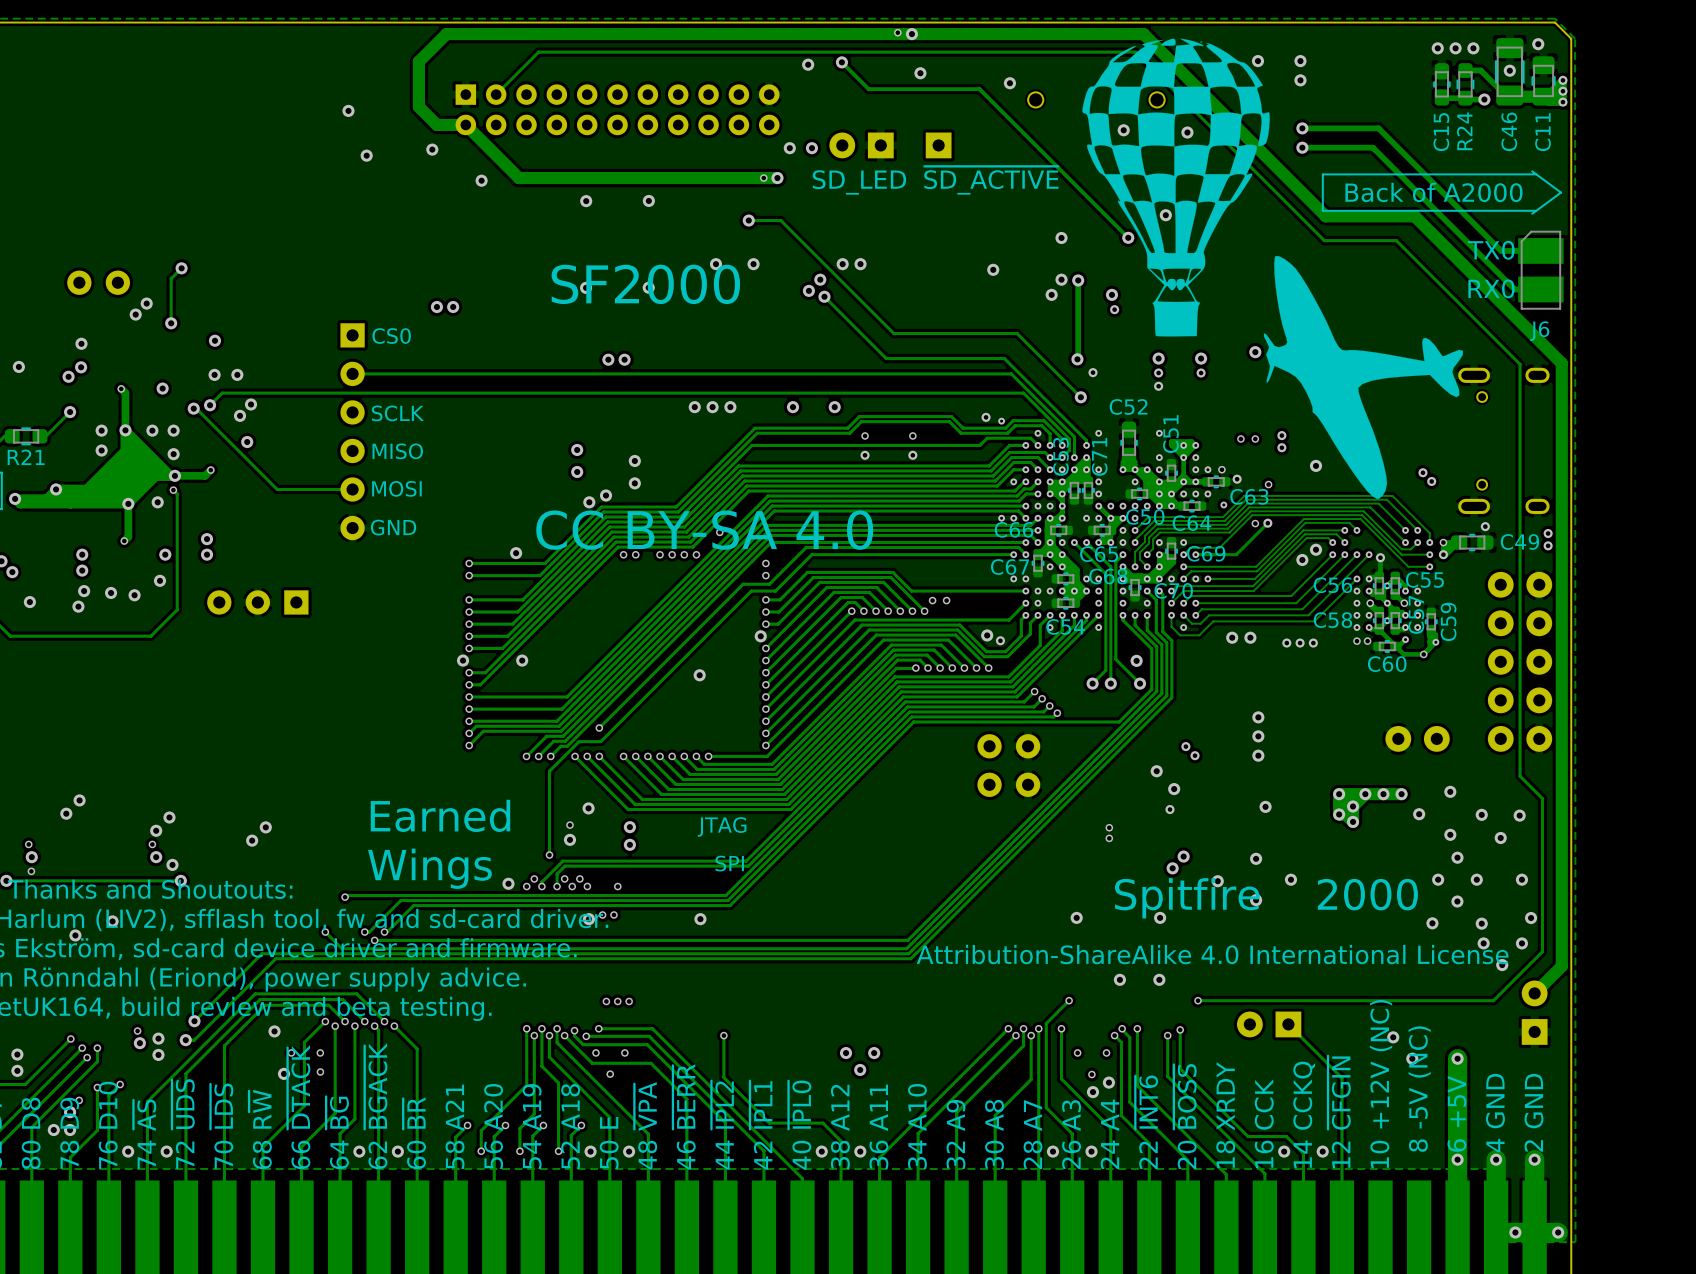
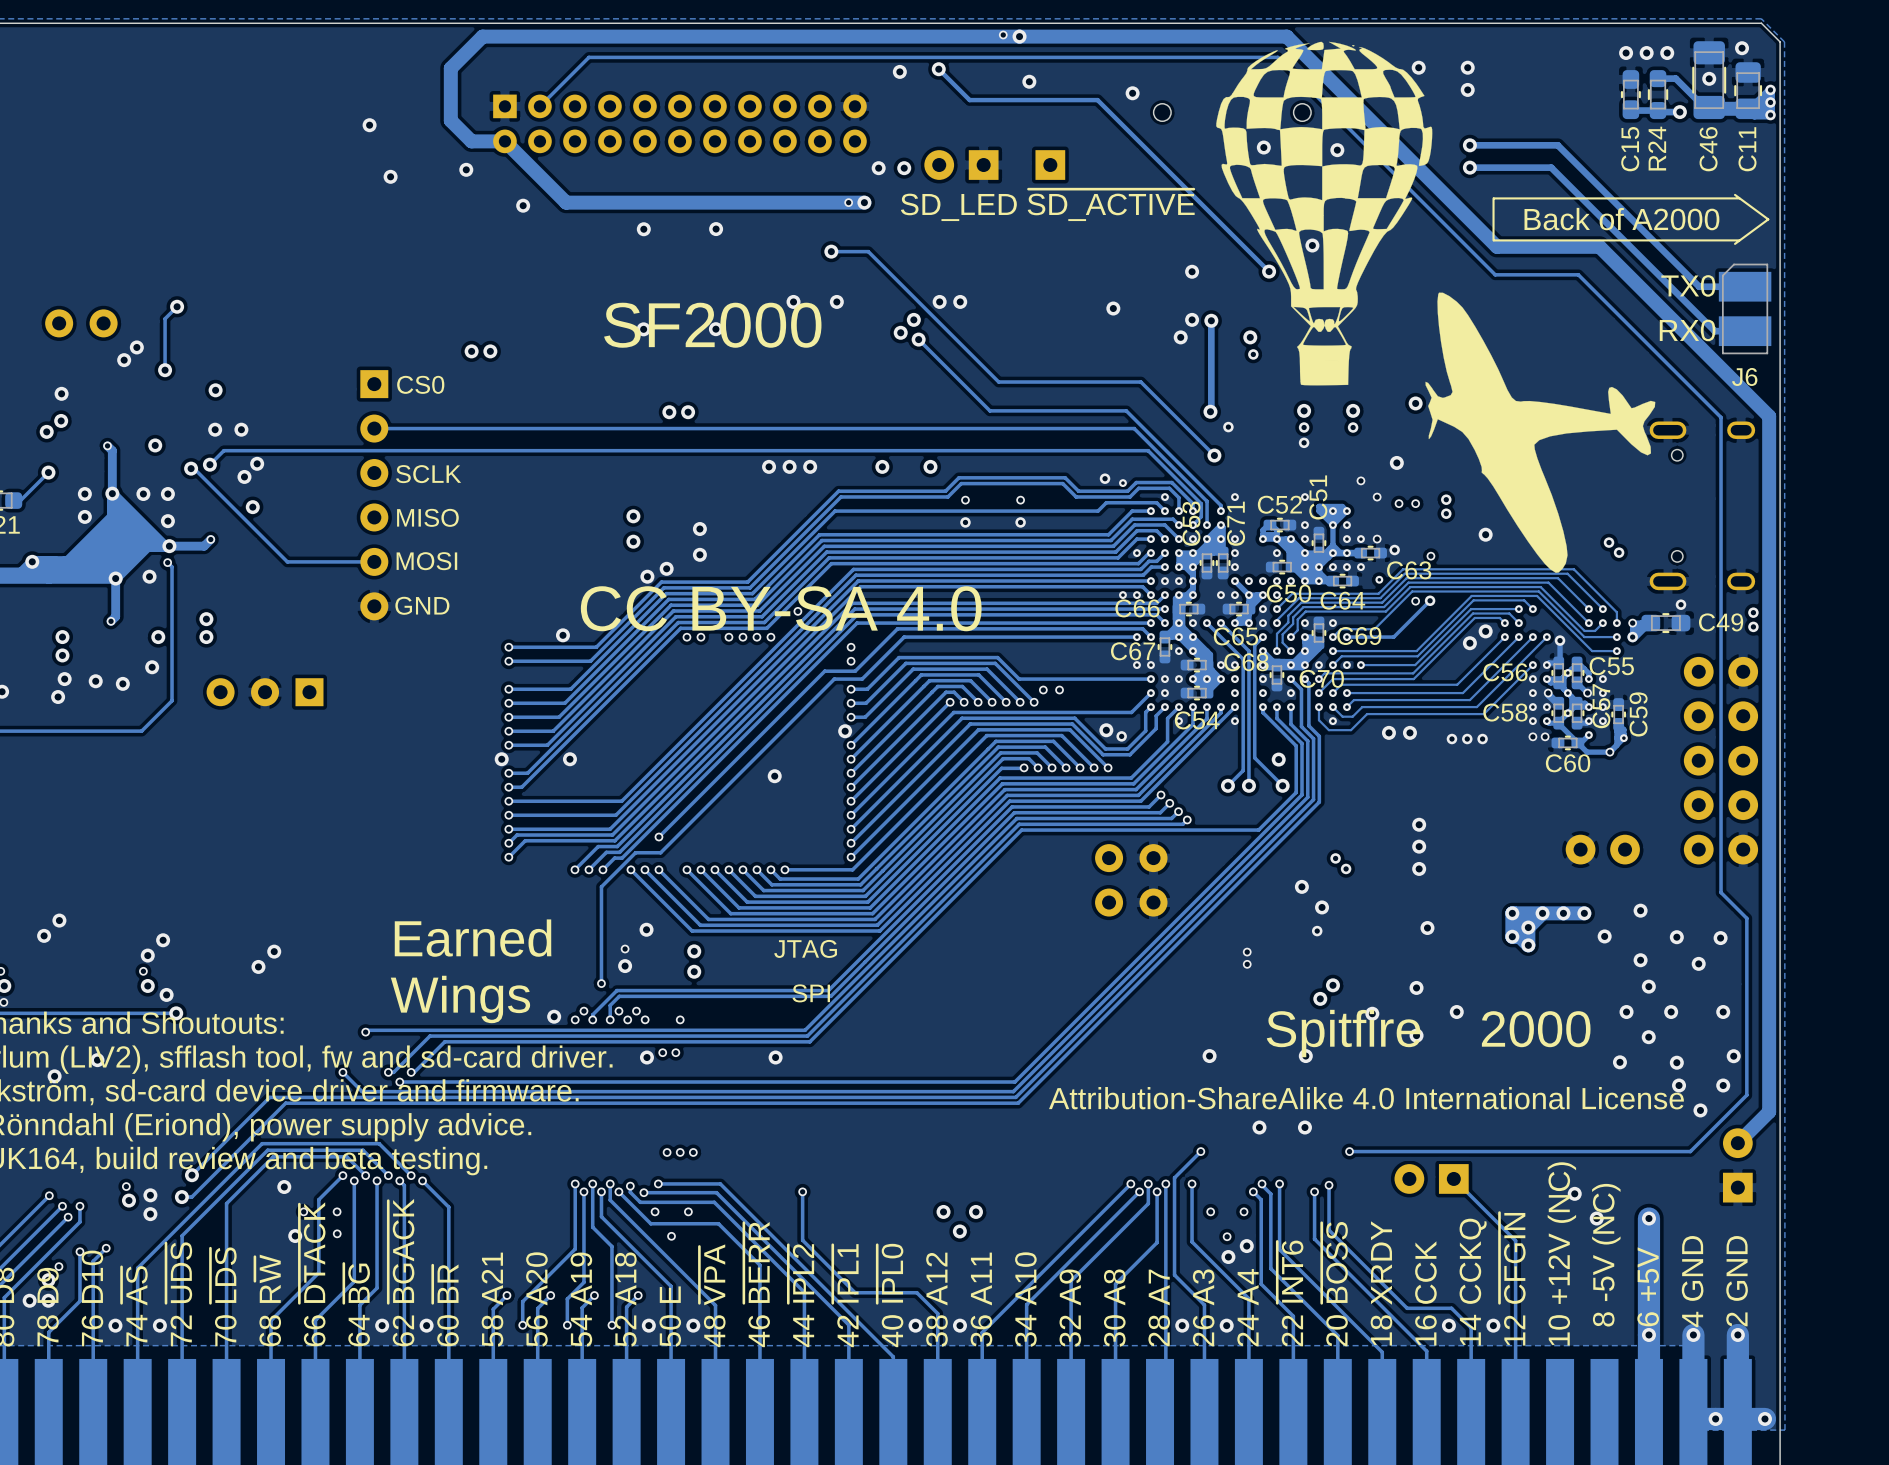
via: none -> (1396, 462)
via: none -> (1360, 480)
C52 footprint: [1120, 421, 1138, 465] -> [1263, 517, 1297, 533]
via: none -> (1377, 497)

